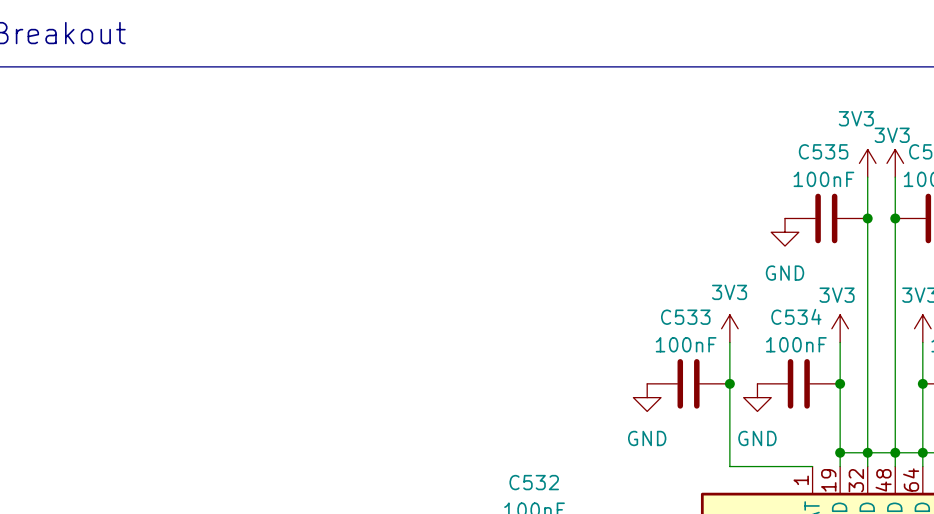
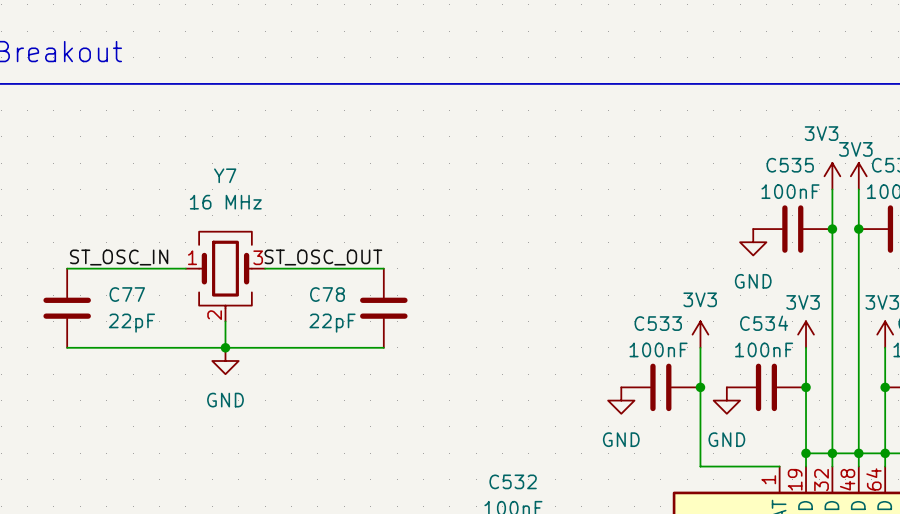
label: none -> ST_OSC_IN (119, 257)
label: none -> ST_OSC_OUT (323, 257)
wire: none -> (67, 268) (185, 268)
wire: none -> (265, 268) (383, 268)
Y7: none -> 16 MHz (225, 276)
C77: none -> 22pF (67, 308)
C78: none -> 22pF (383, 308)
wire: none -> (225, 321) (225, 347)
wire: none -> (67, 347) (383, 347)
junction: none -> (225, 347)
power symbol: none -> GND (225, 361)

